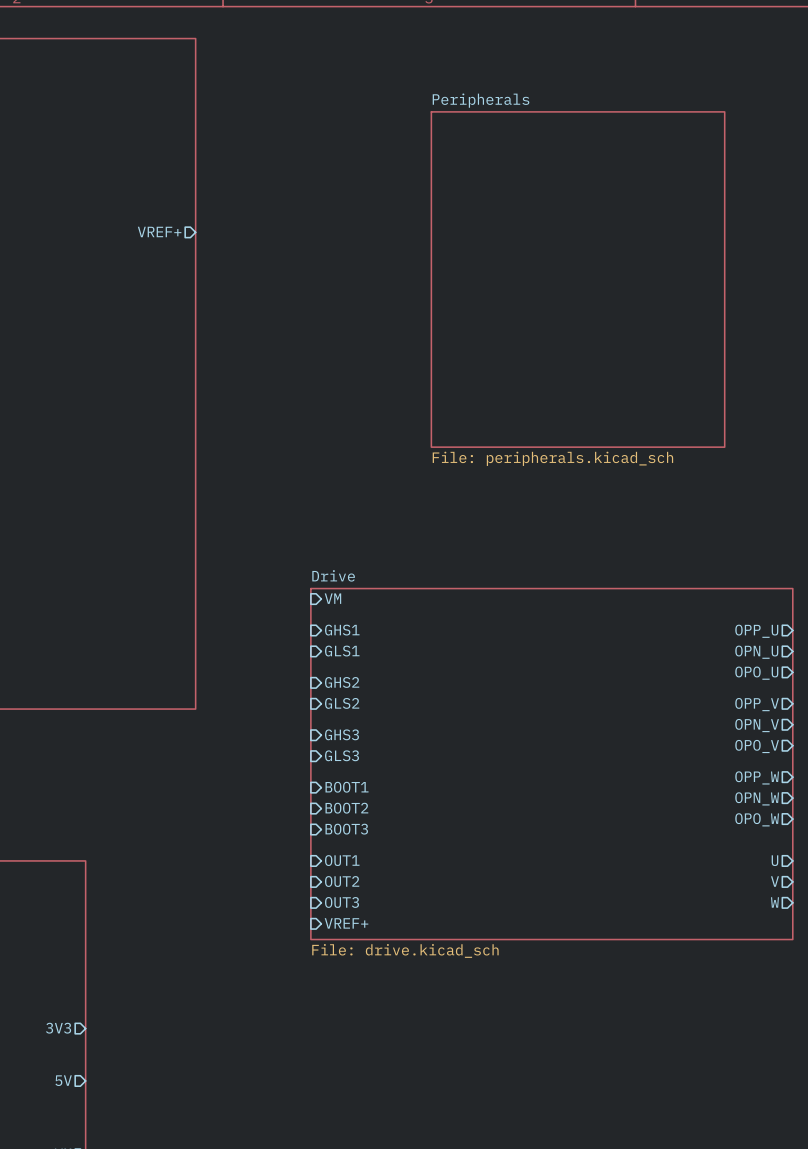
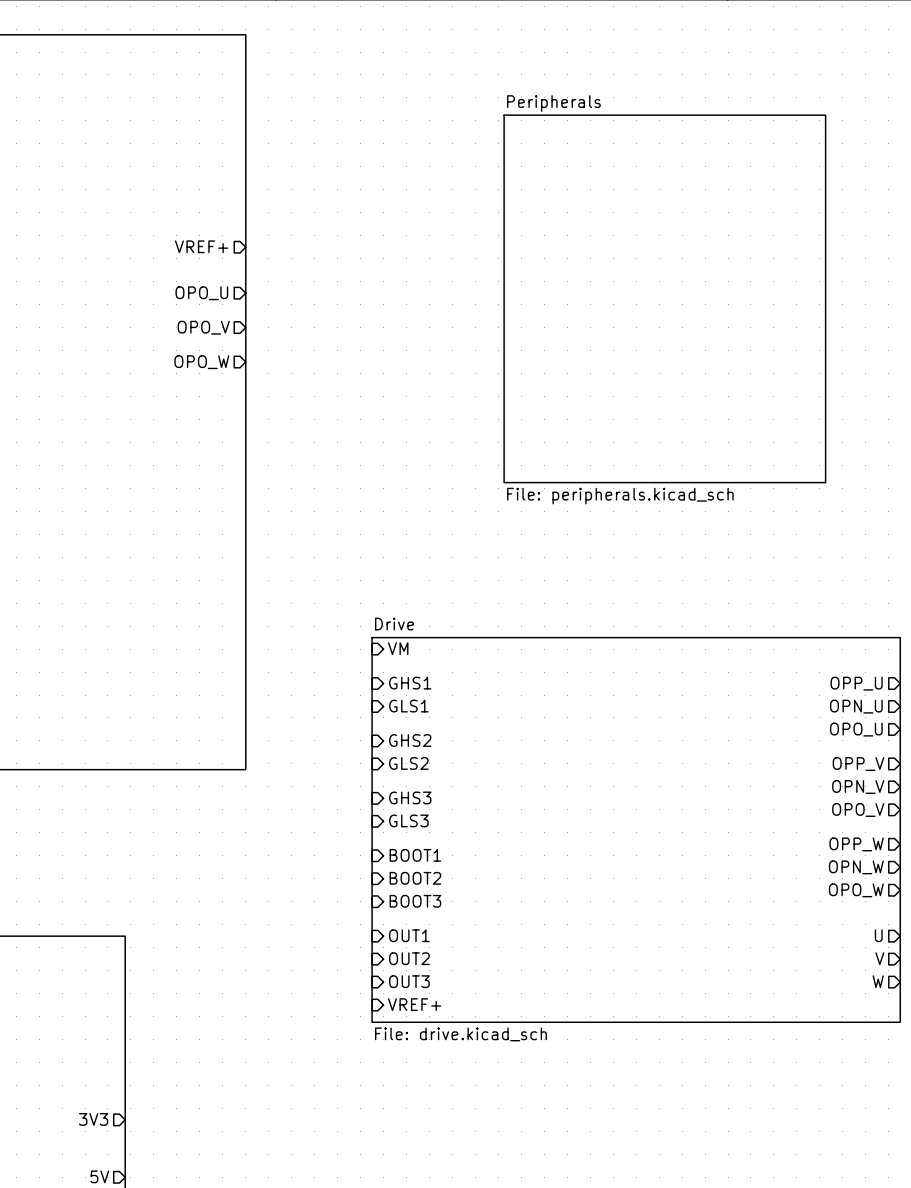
sheet pin: none -> OPO_U (201, 293)
sheet pin: none -> OPO_V (203, 327)
sheet pin: none -> OPO_W (201, 362)

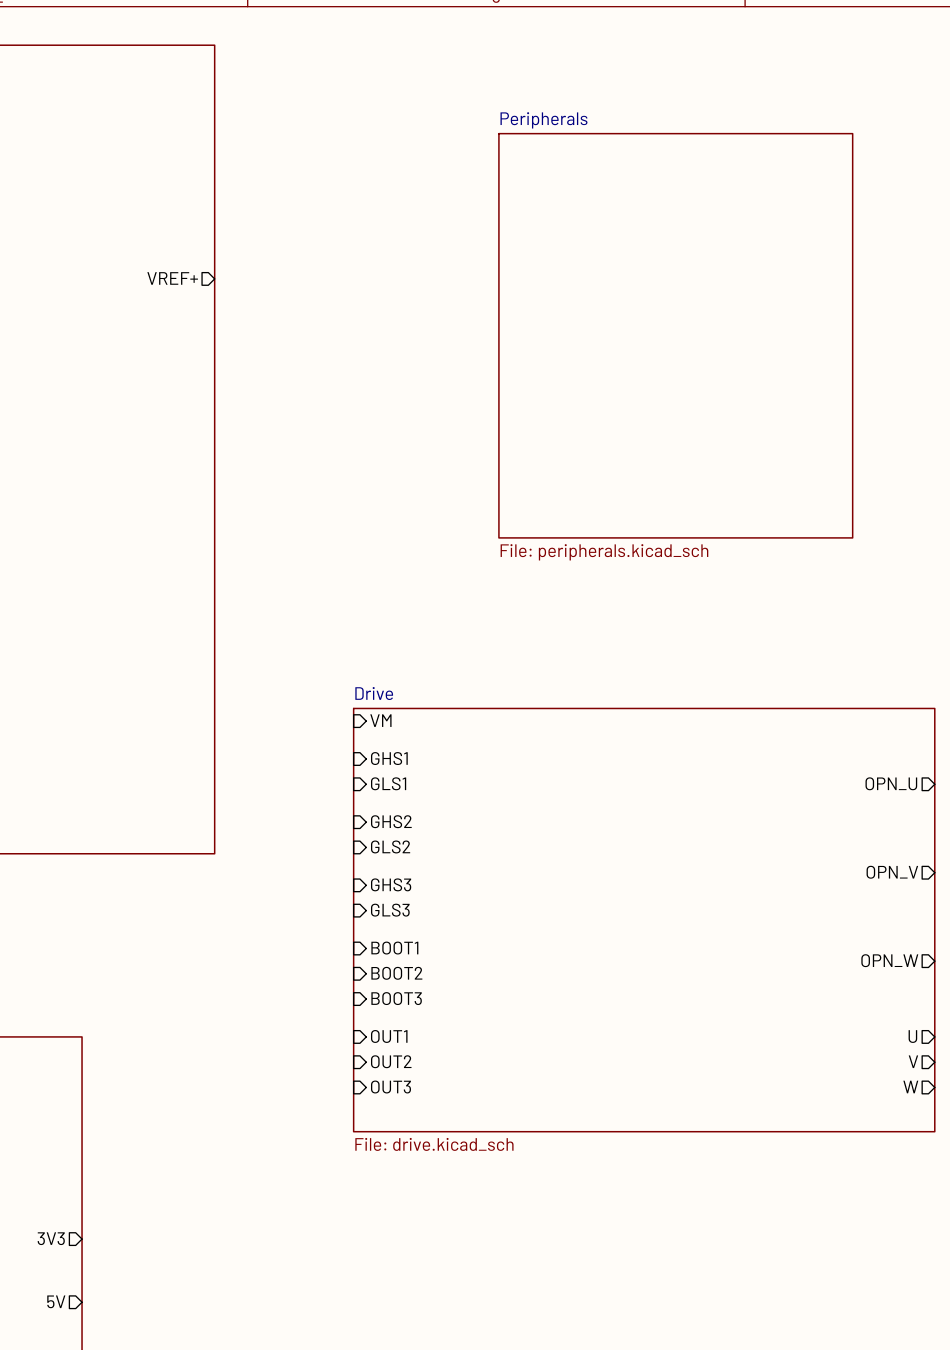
sheet pin: OPO_U (201, 293) -> none
sheet pin: OPO_V (203, 327) -> none
sheet pin: OPO_W (201, 362) -> none
sheet pin: OPP_U (856, 683) -> none
sheet pin: OPO_U (856, 729) -> none
sheet pin: OPP_V (858, 764) -> none
sheet pin: OPO_V (858, 809) -> none
sheet pin: OPP_W (856, 844) -> none
sheet pin: OPO_W (856, 890) -> none
sheet pin: VREF+ (414, 1004) -> none

